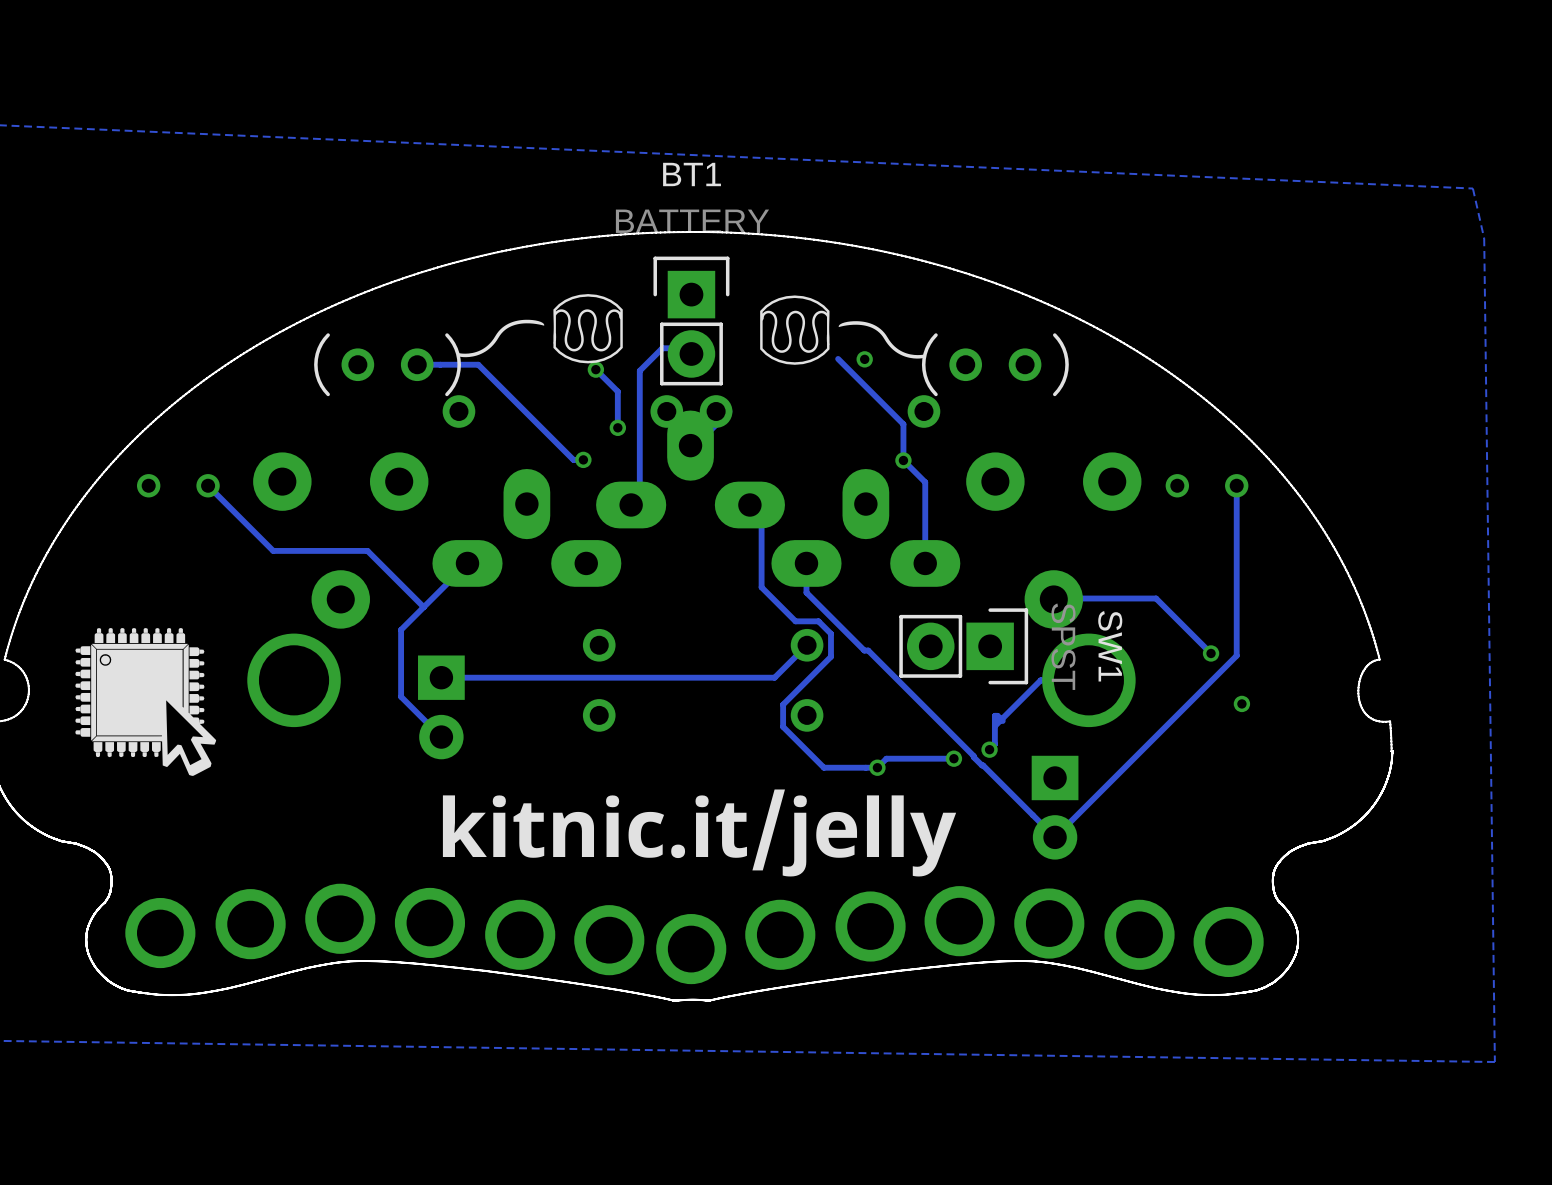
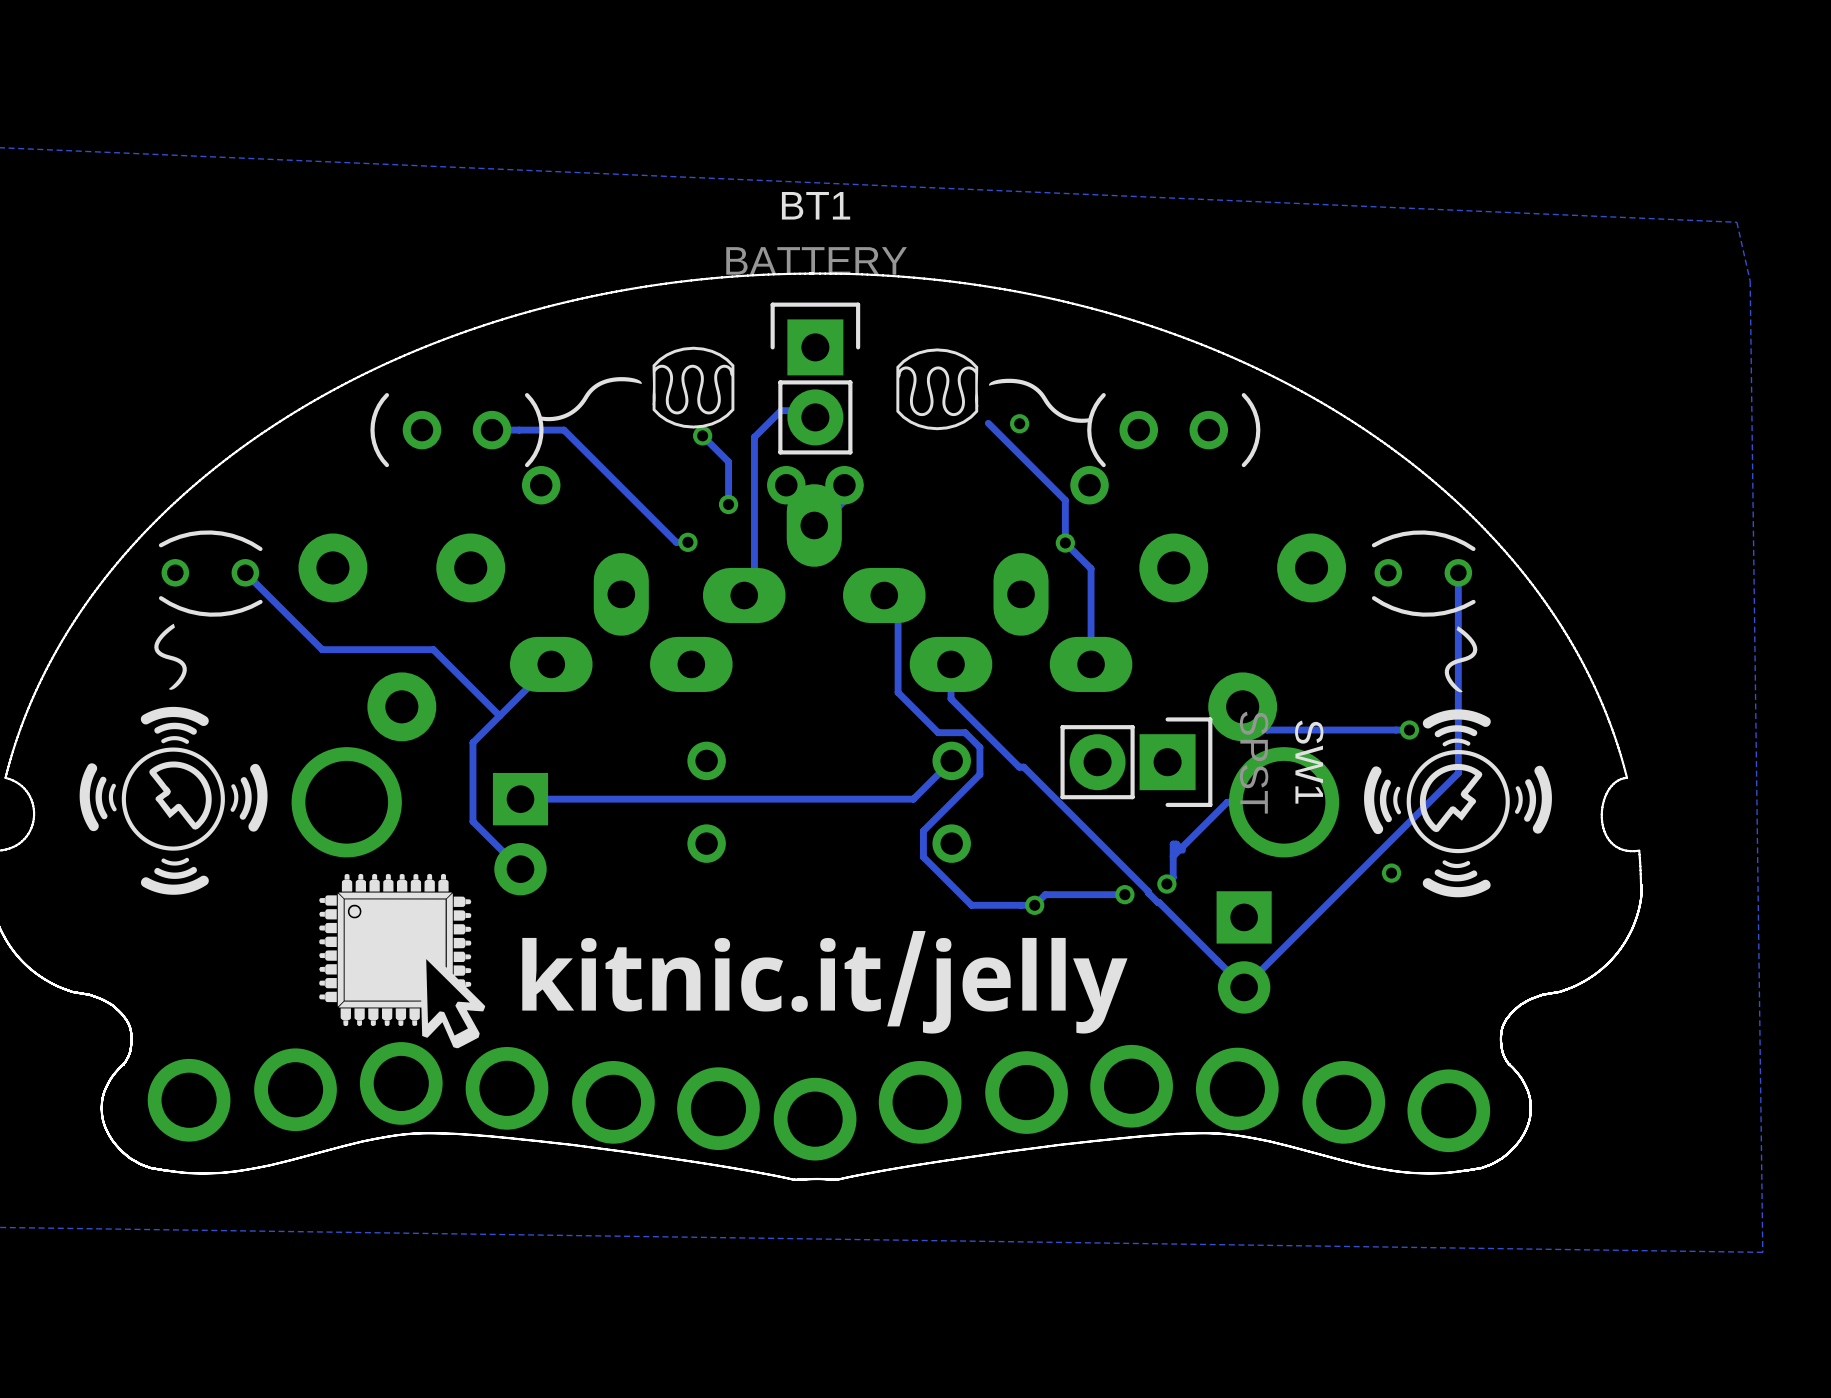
part footprint: [137, 474, 220, 498] -> [158, 530, 263, 617]
part footprint: [1165, 474, 1249, 498] -> [1371, 530, 1476, 617]
drawing: none -> [79, 623, 268, 895]
drawing: none -> [1364, 626, 1552, 898]
track: (1053, 598) (1156, 598) (1211, 653) -> (1242, 705) (1266, 730) (1409, 730)
via position: (1211, 653) -> (1409, 730)
drawing position: (145, 701) -> (402, 961)
via: (1241, 703) -> none
via: none -> (1391, 873)

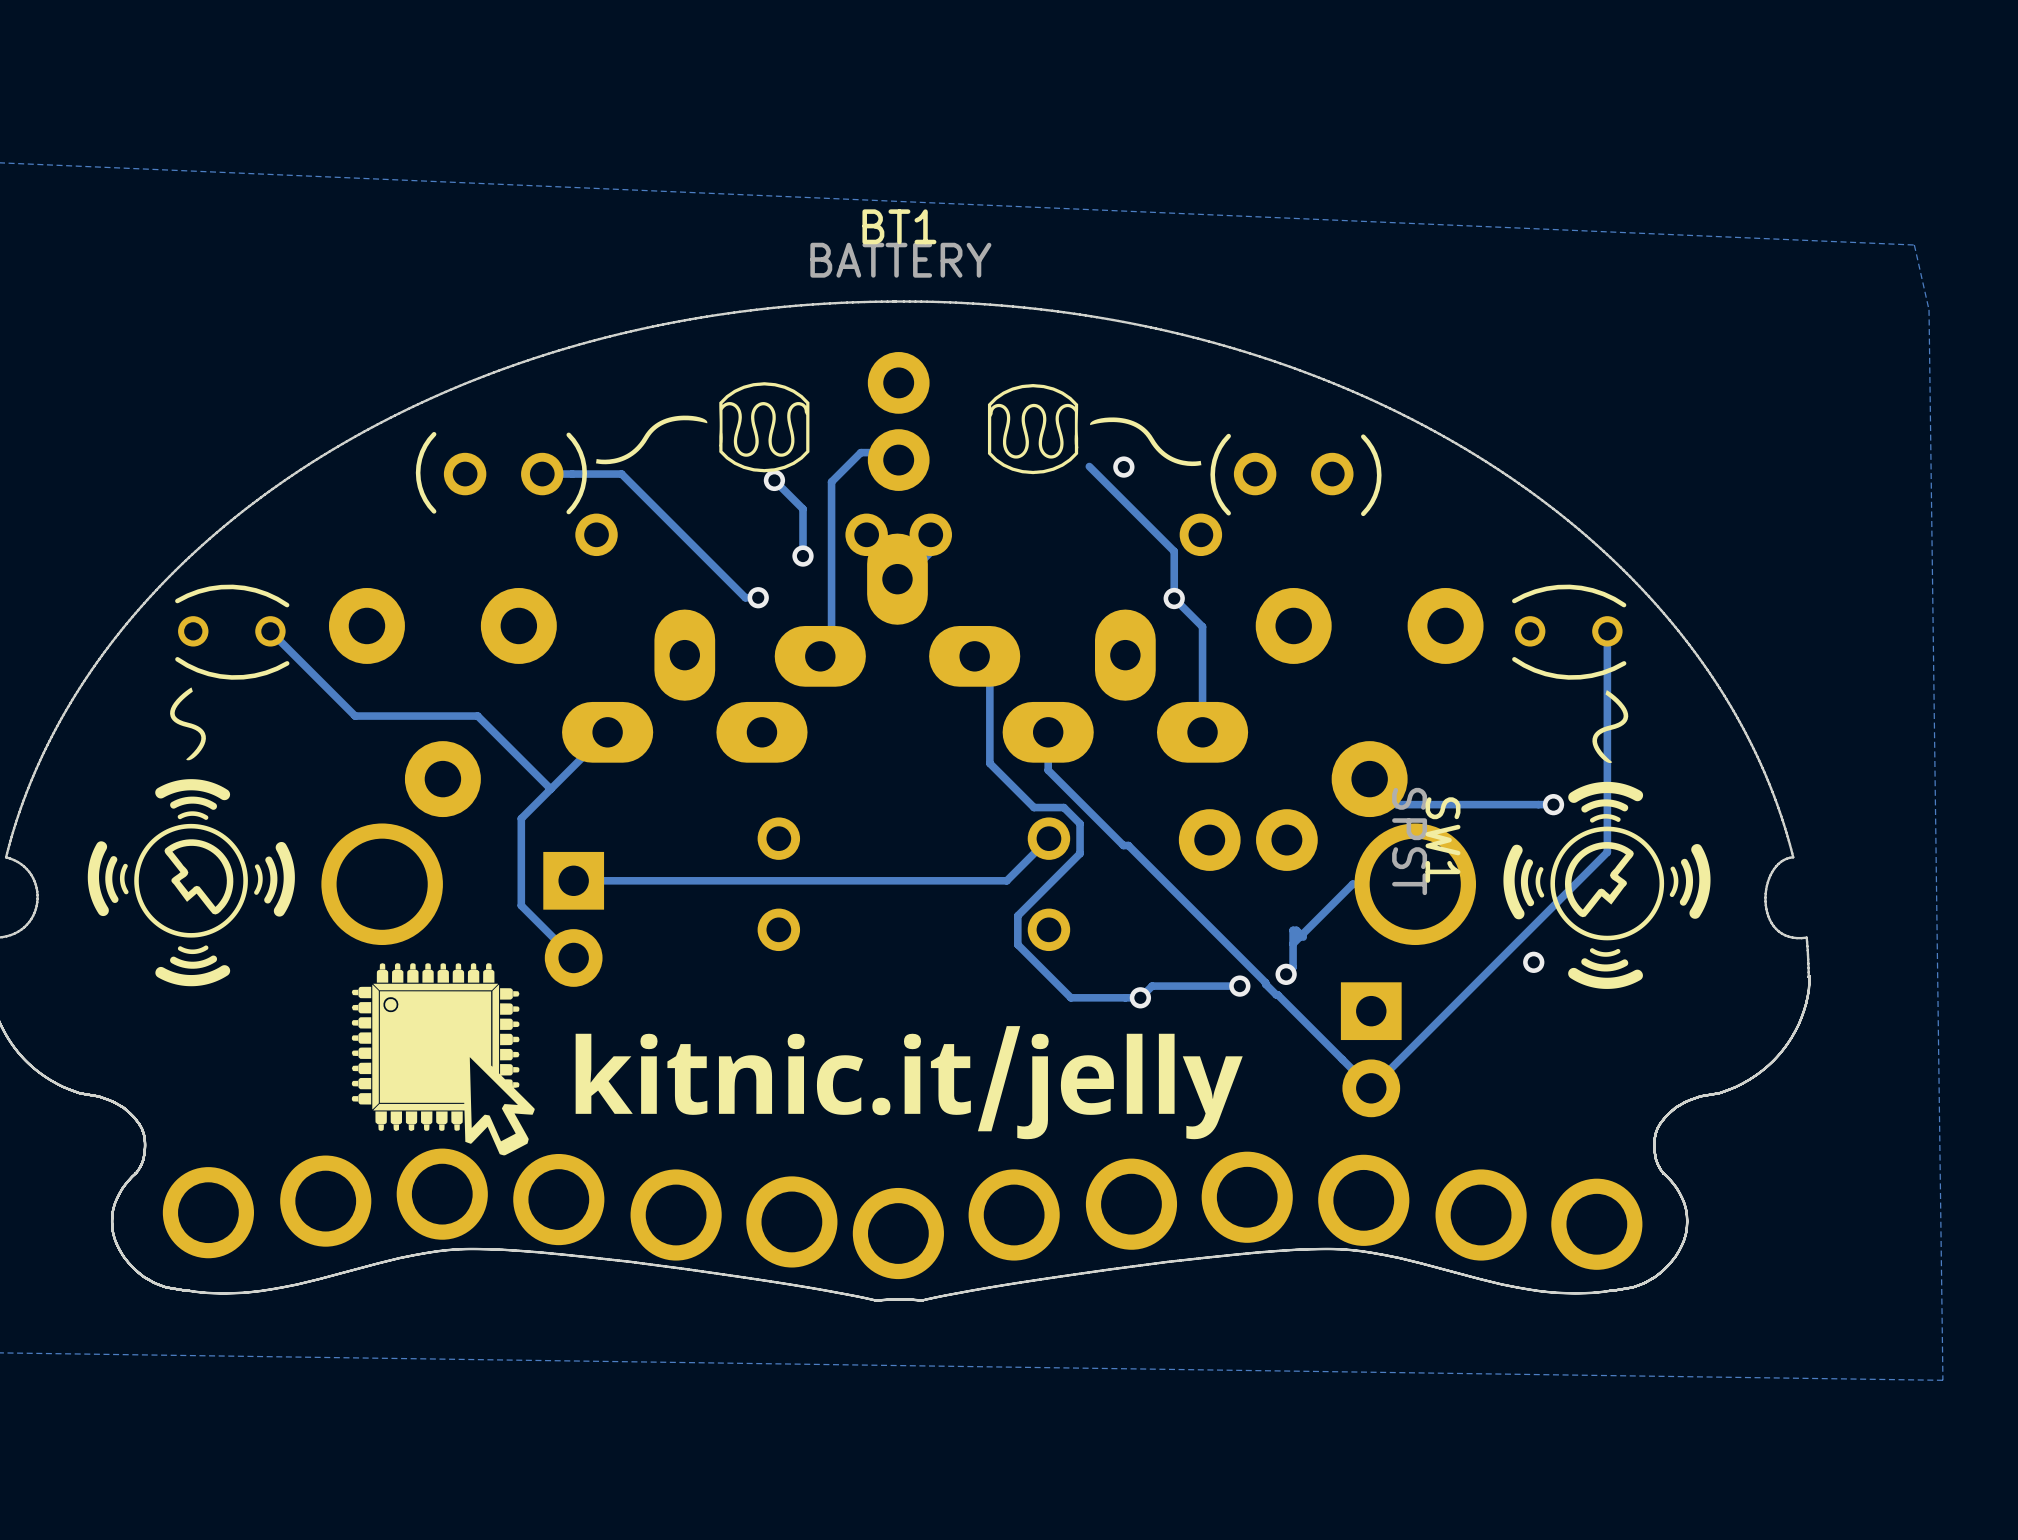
BT1 footprint: [770, 302, 861, 455] -> [867, 352, 930, 491]
part footprint: [370, 393, 544, 468] -> [415, 431, 587, 515]
part footprint: [1087, 393, 1261, 468] -> [1210, 433, 1382, 517]
SW1 footprint: [1060, 717, 1213, 807] -> [1178, 809, 1318, 871]

